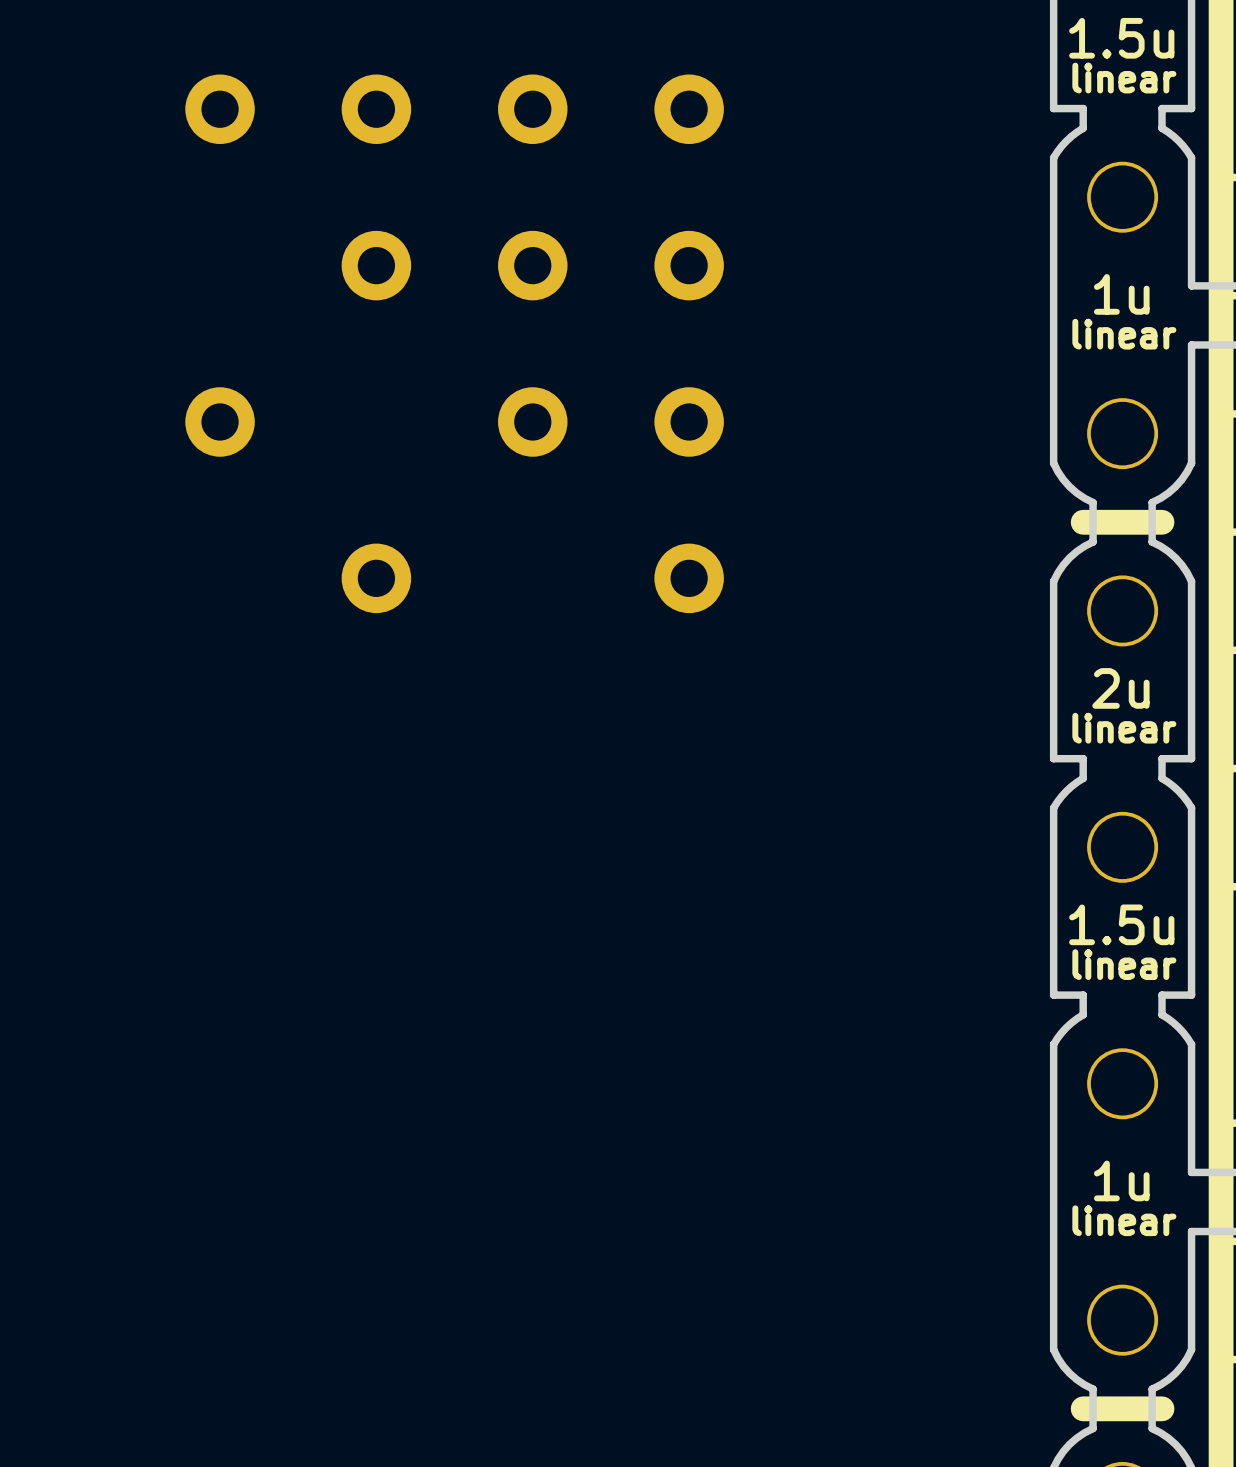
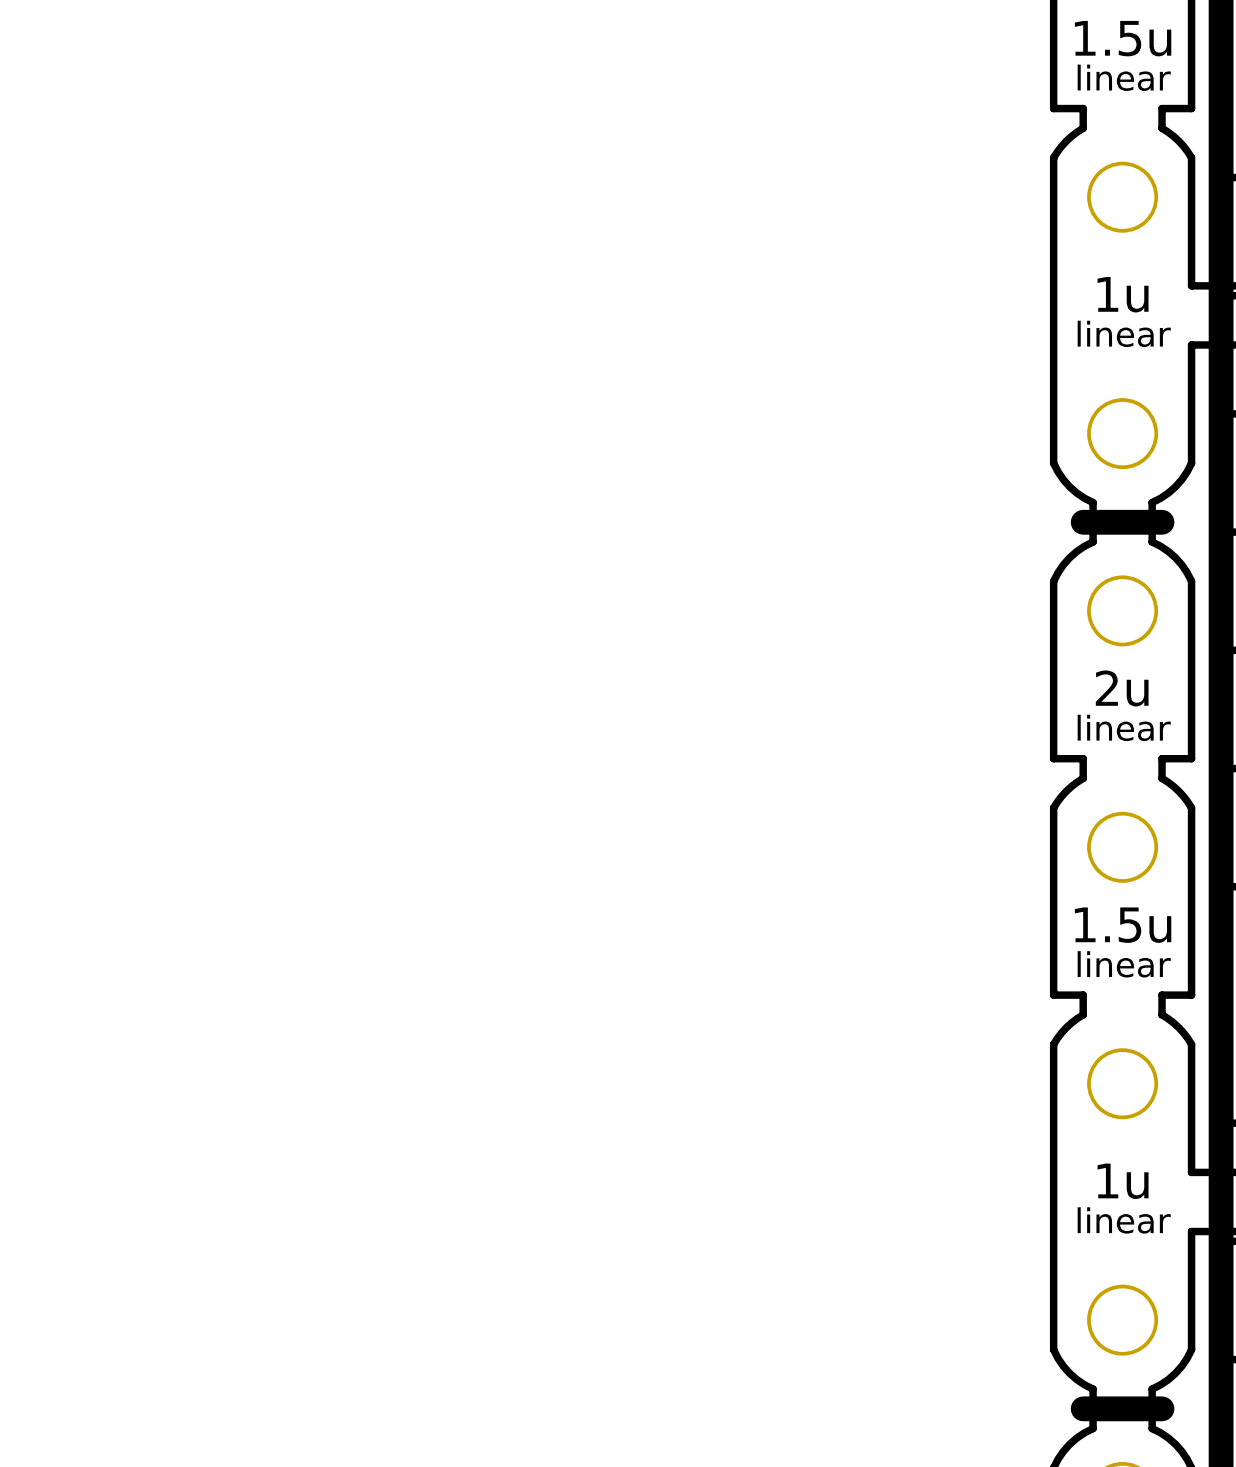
part: (220, 109) -> none
part: (376, 109) -> none
part: (532, 109) -> none
part: (689, 109) -> none
part: (376, 265) -> none
part: (532, 265) -> none
part: (689, 265) -> none
part: (220, 421) -> none
part: (532, 421) -> none
part: (689, 421) -> none
part: (376, 578) -> none
part: (689, 578) -> none

